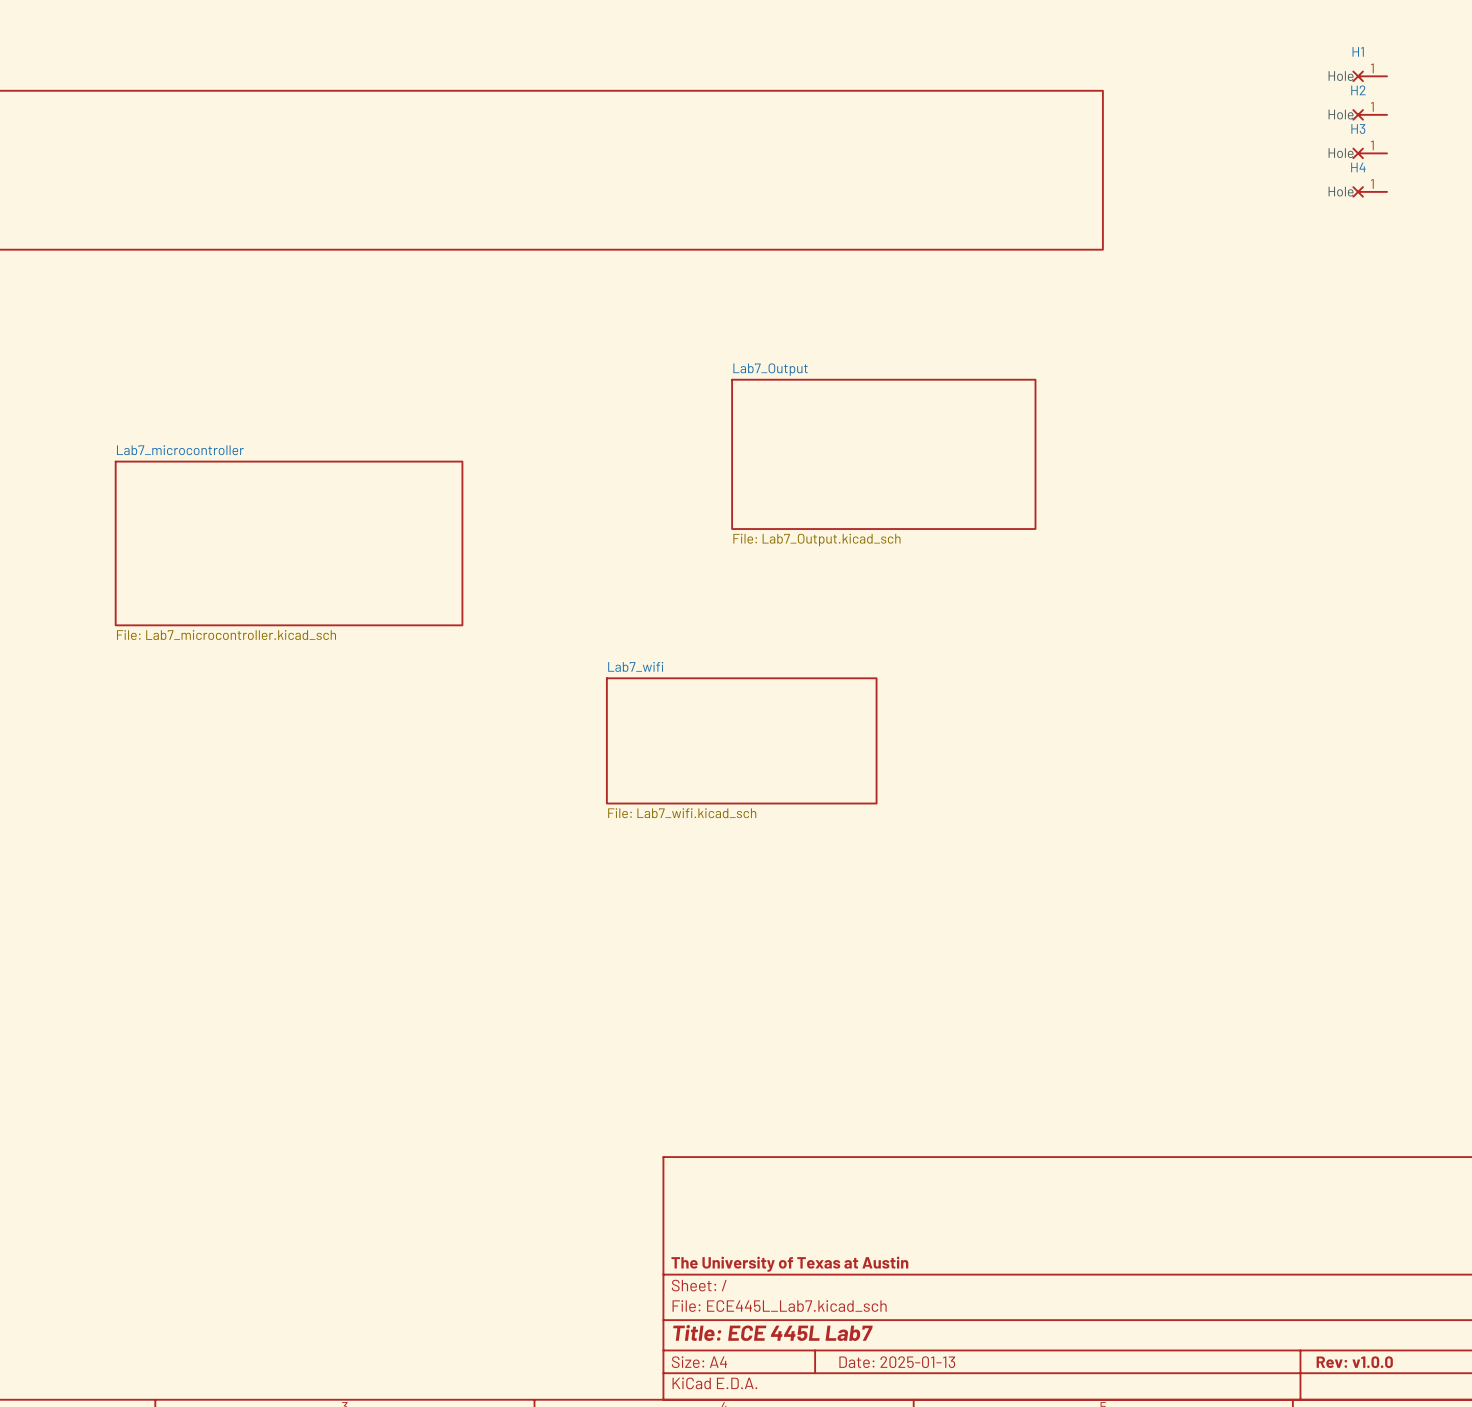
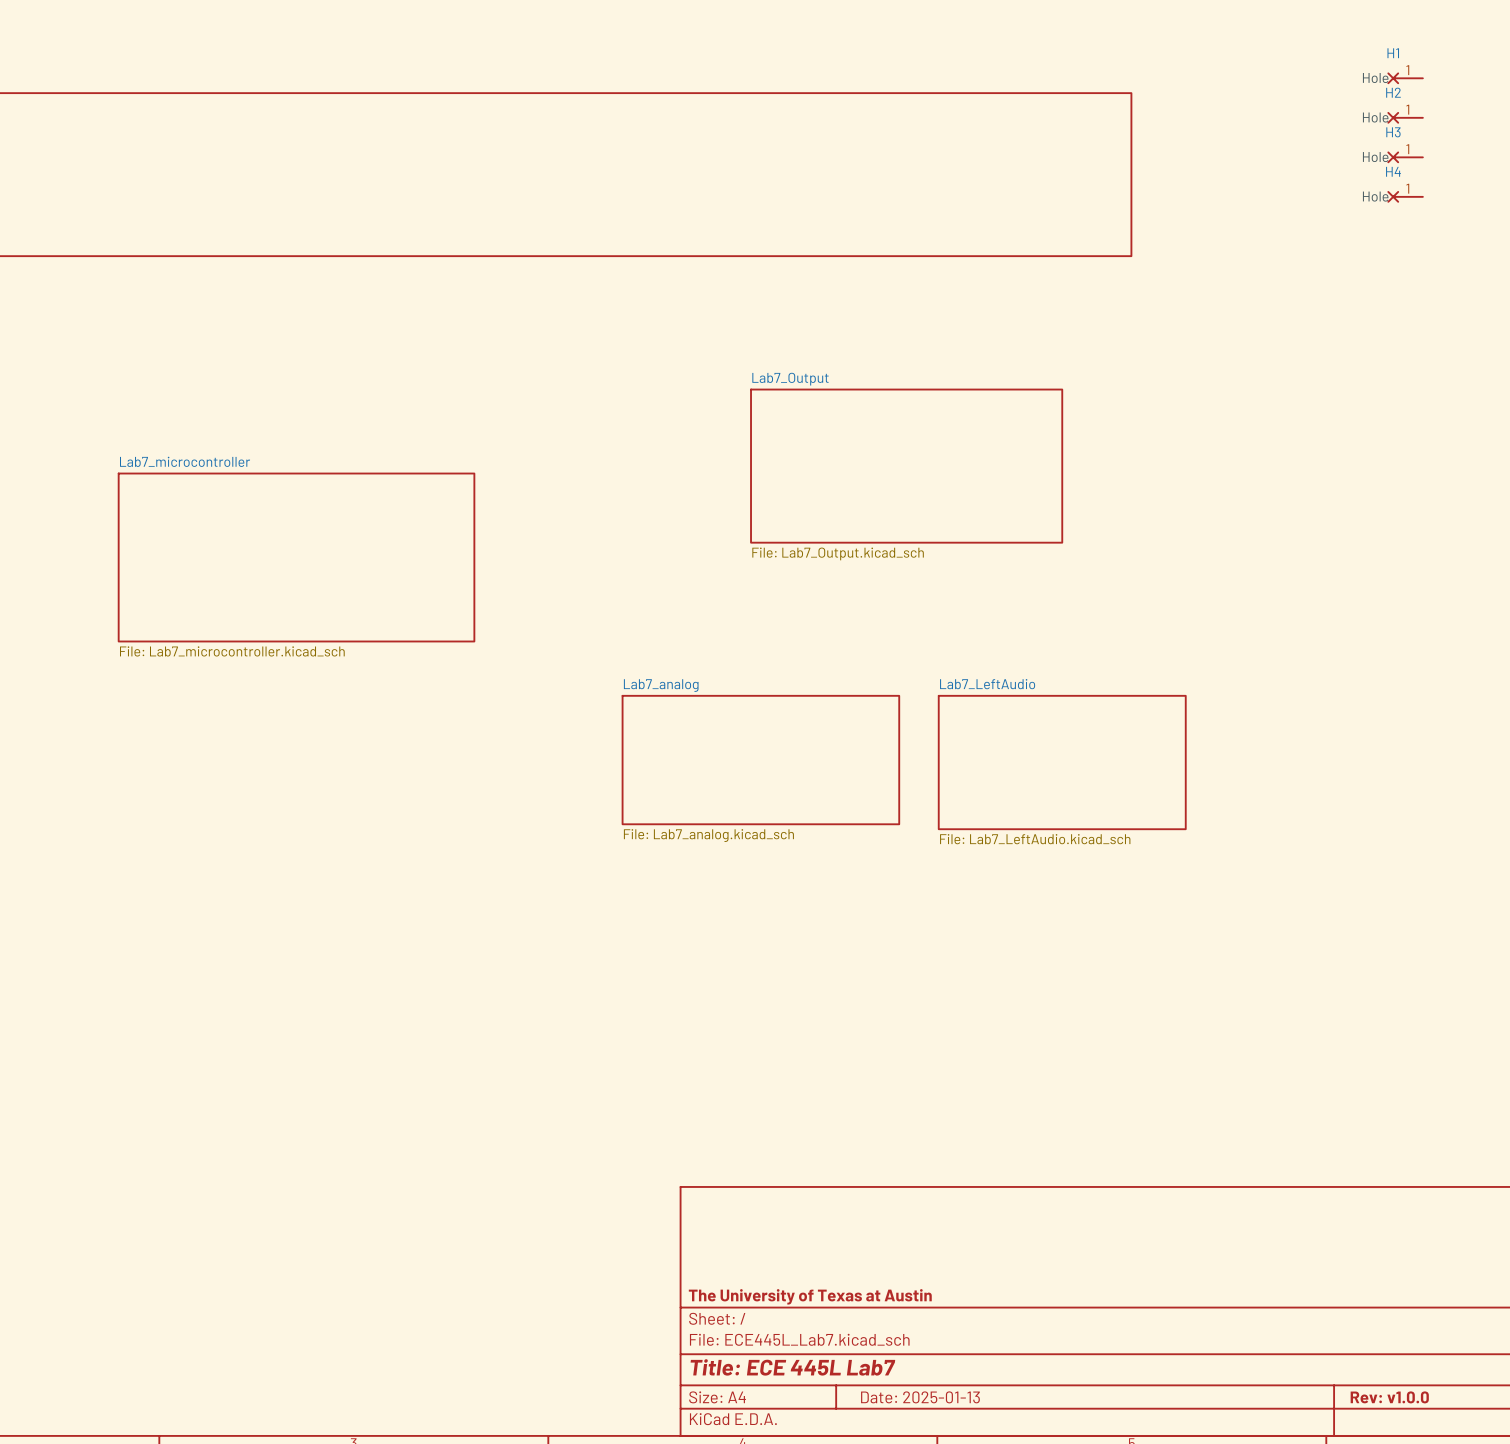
sheet Lab7_wifi name: Lab7_wifi (635, 666) -> Lab7_analog (661, 685)
sheet Lab7_LeftAudio: none -> File: Lab7_LeftAudio.kicad_sch (1062, 762)
sheet Lab7_wifi value: File: Lab7_wifi.kicad_sch (682, 813) -> File: Lab7_analog.kicad_sch (708, 835)

